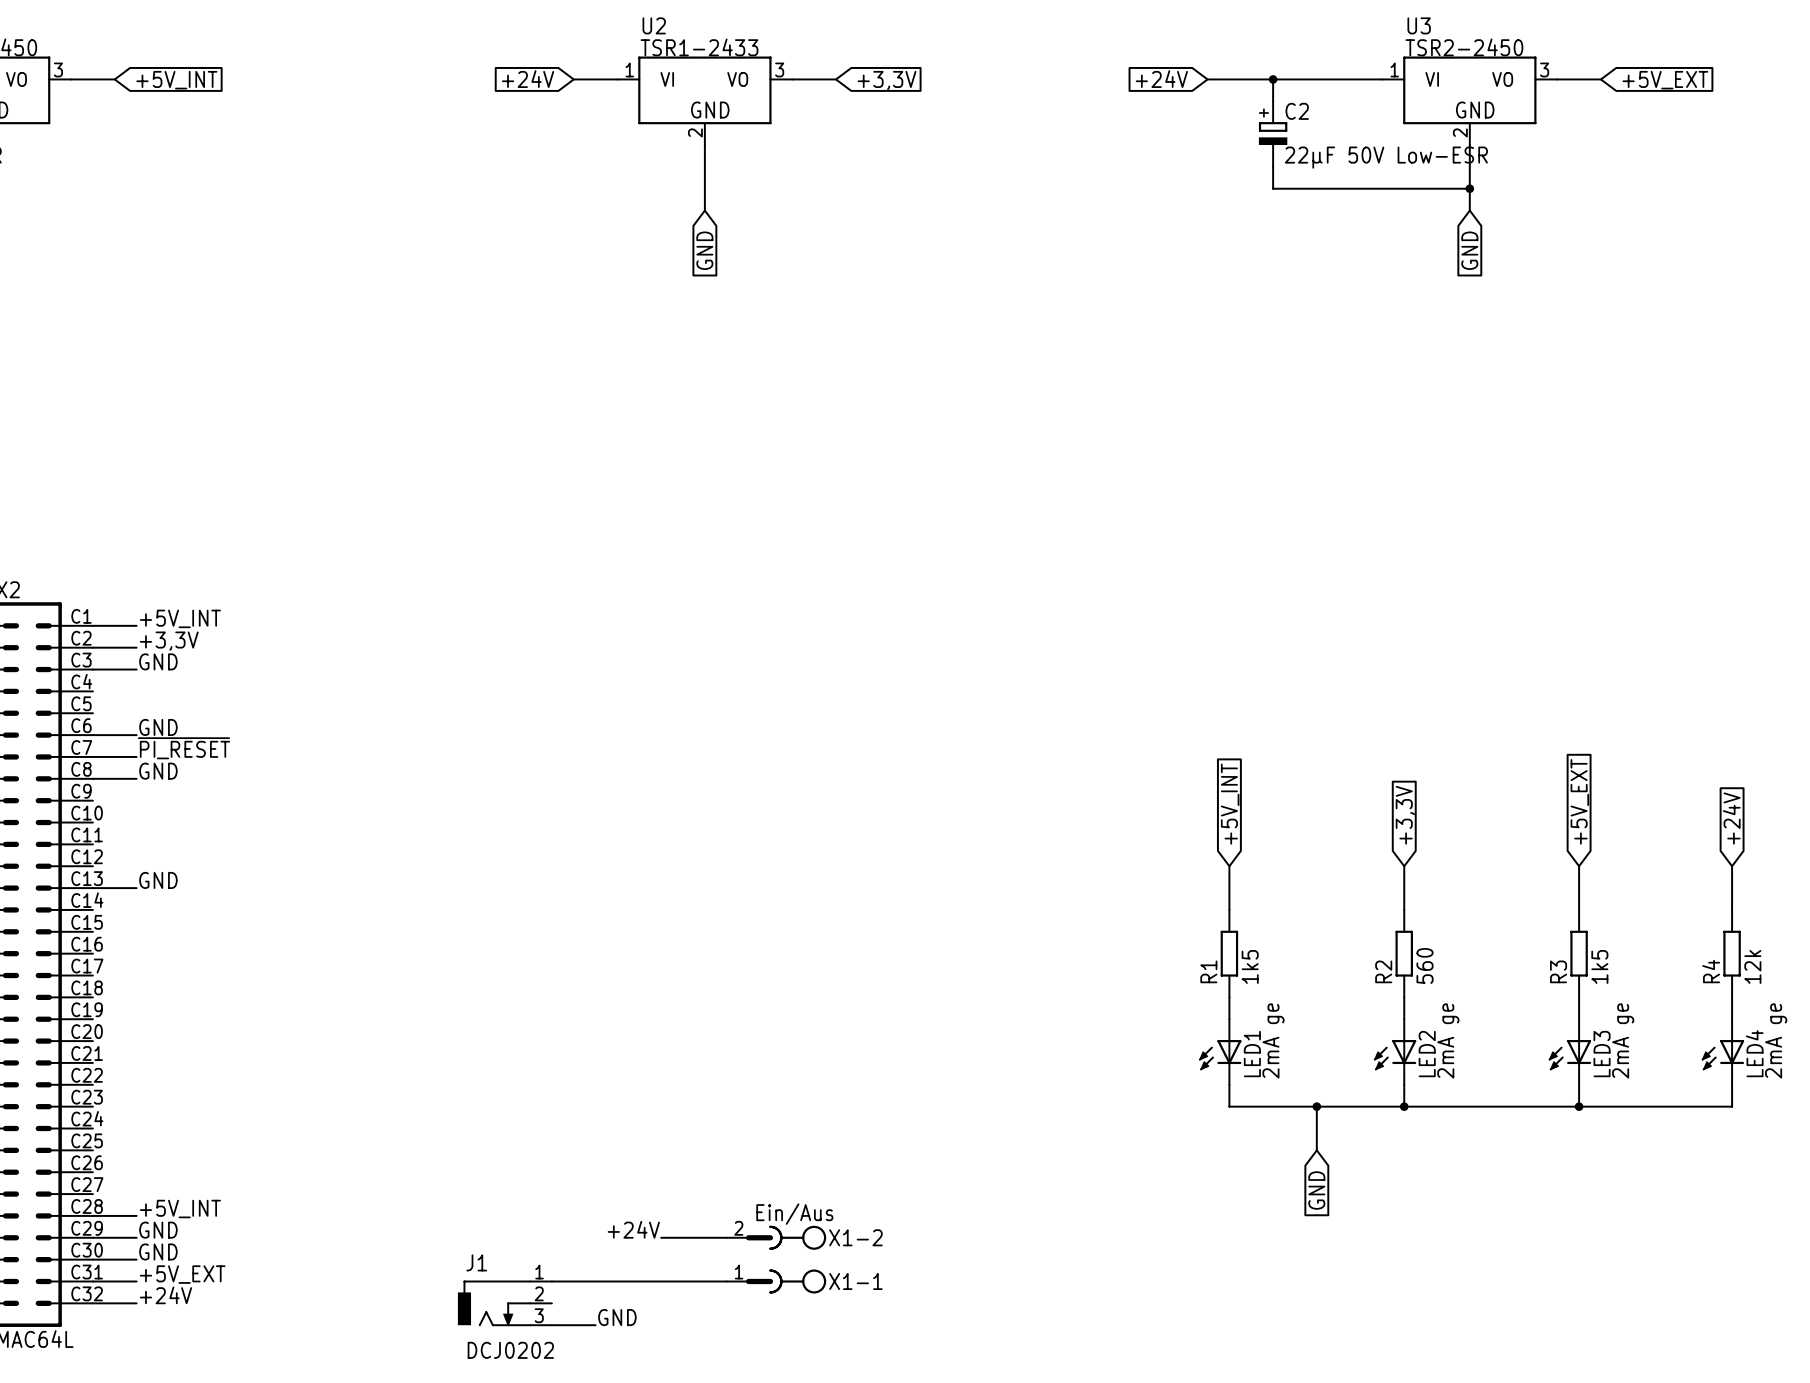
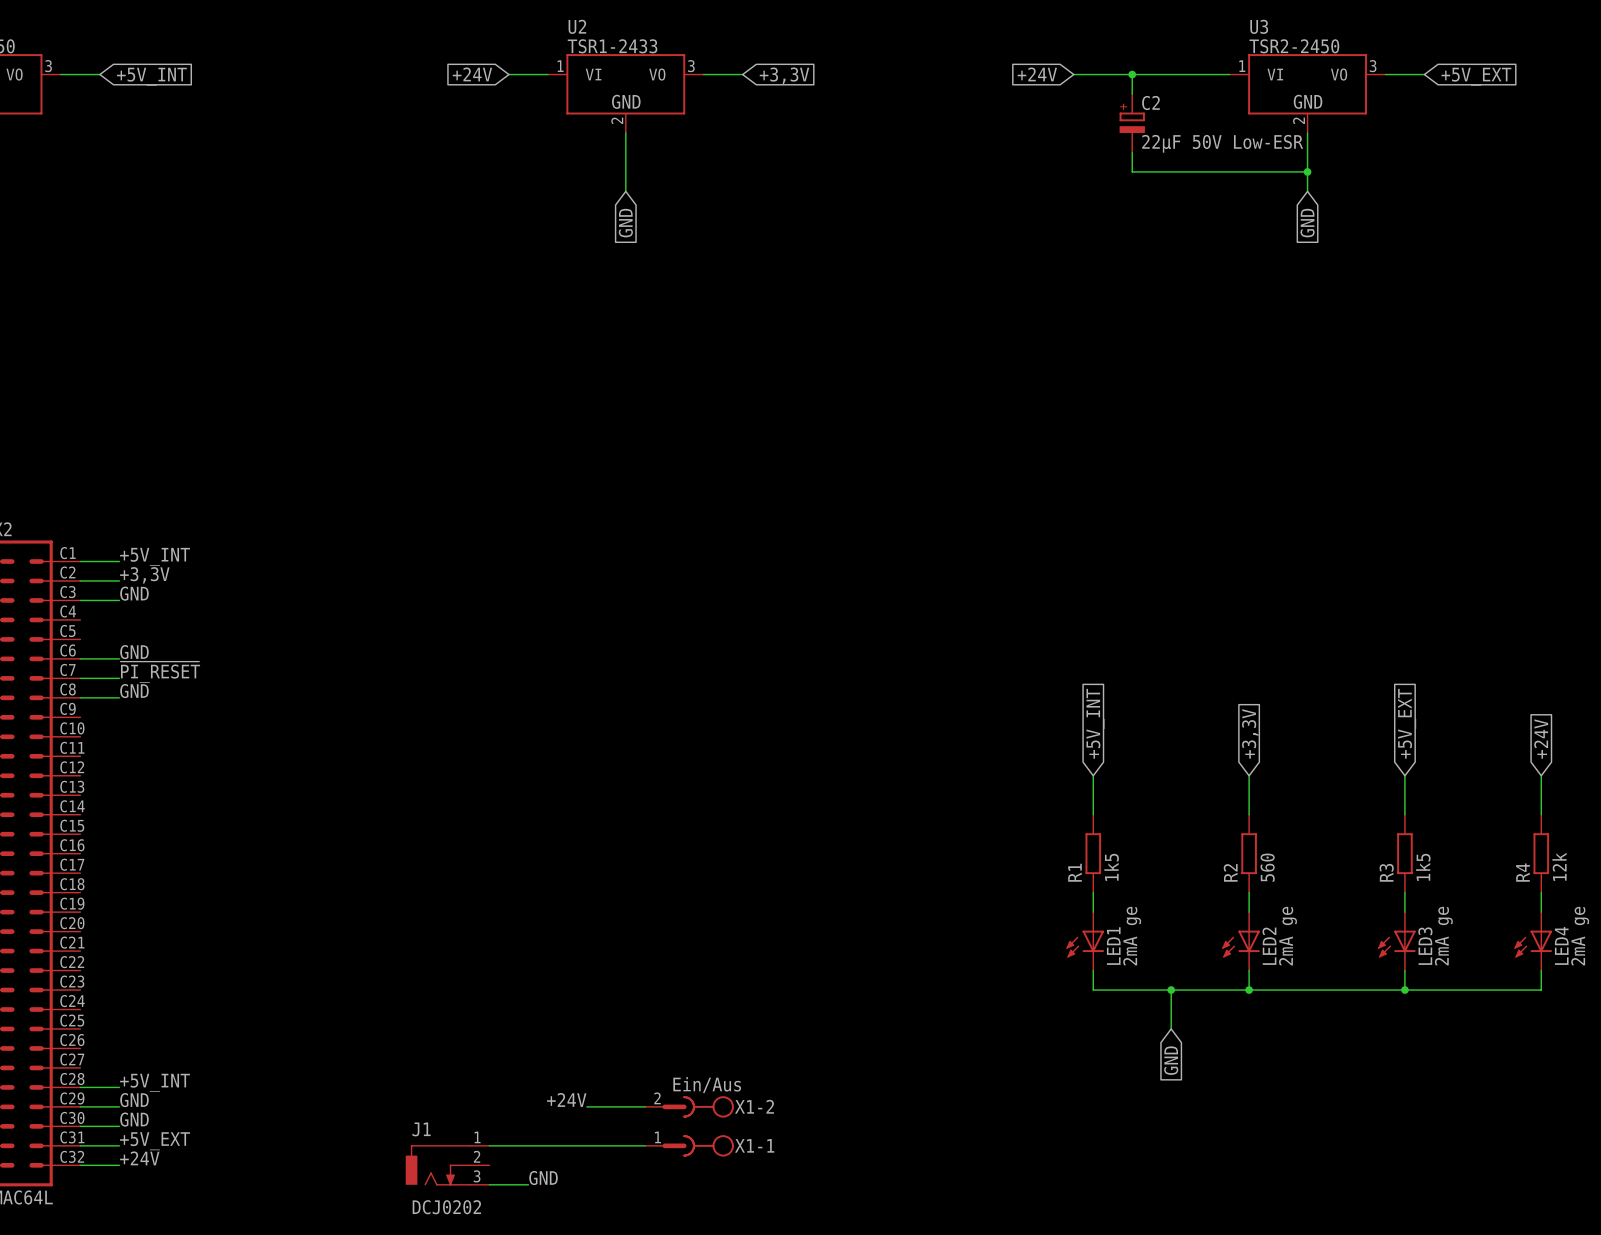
label: GND (158, 880) -> none
wire: (92, 888) (136, 888) -> none

